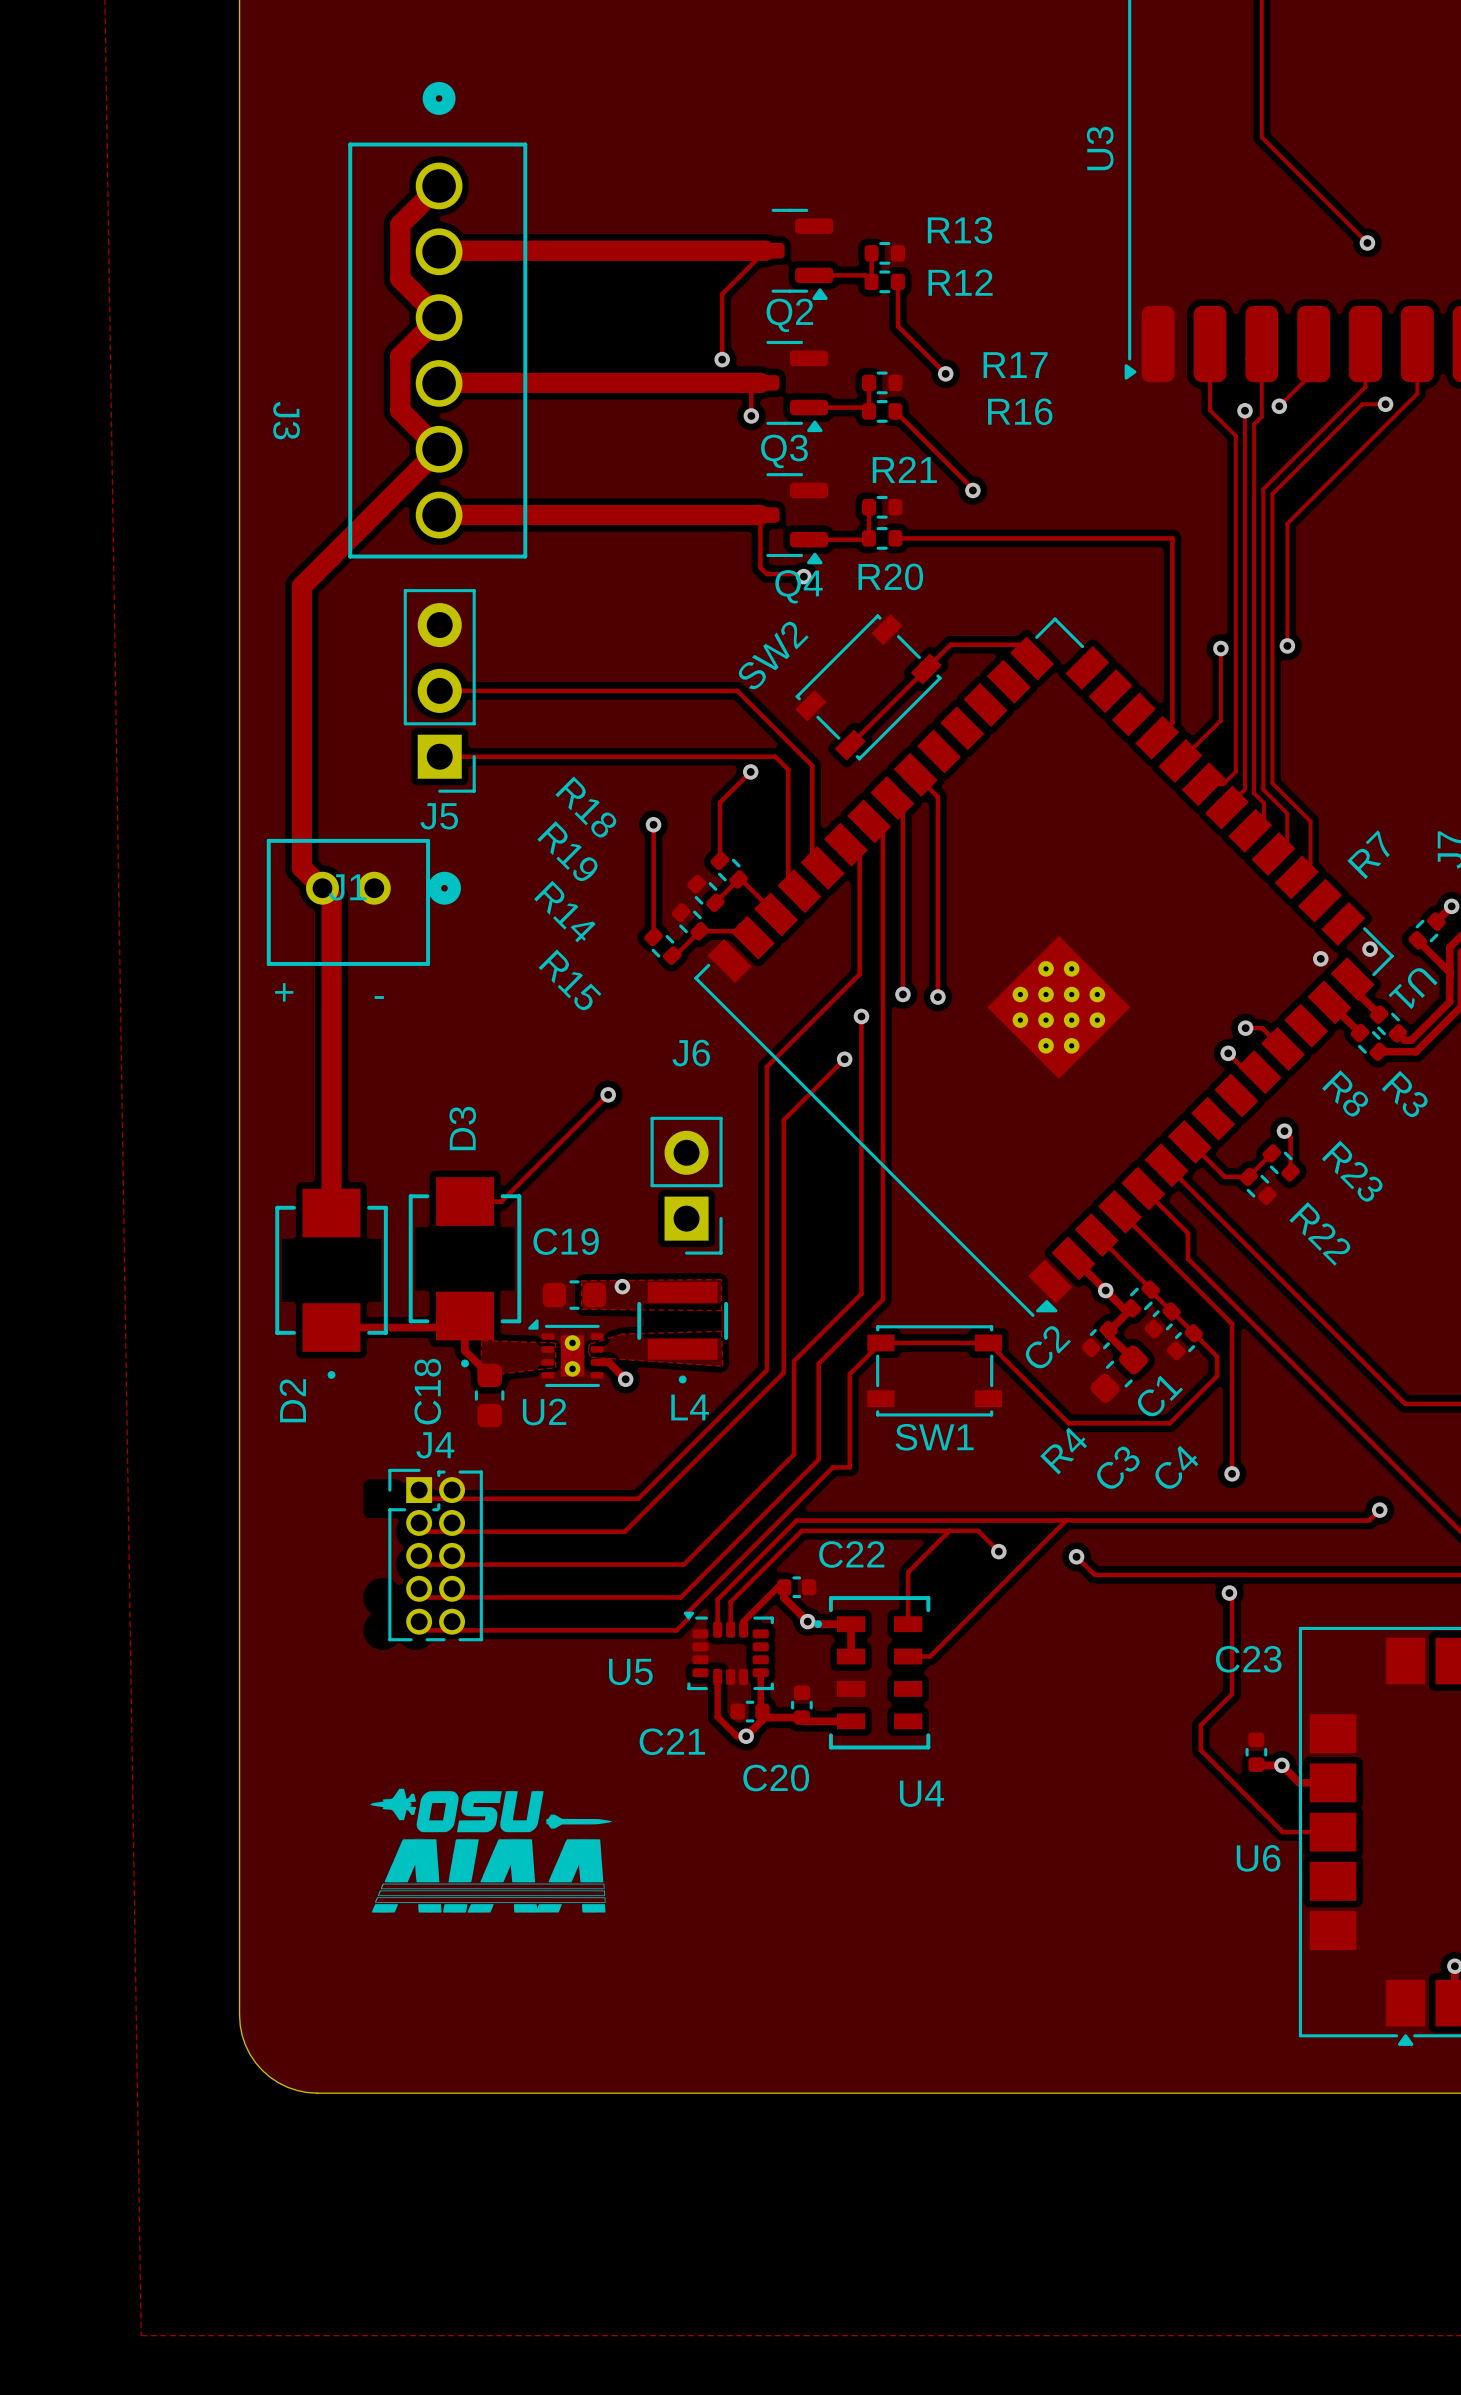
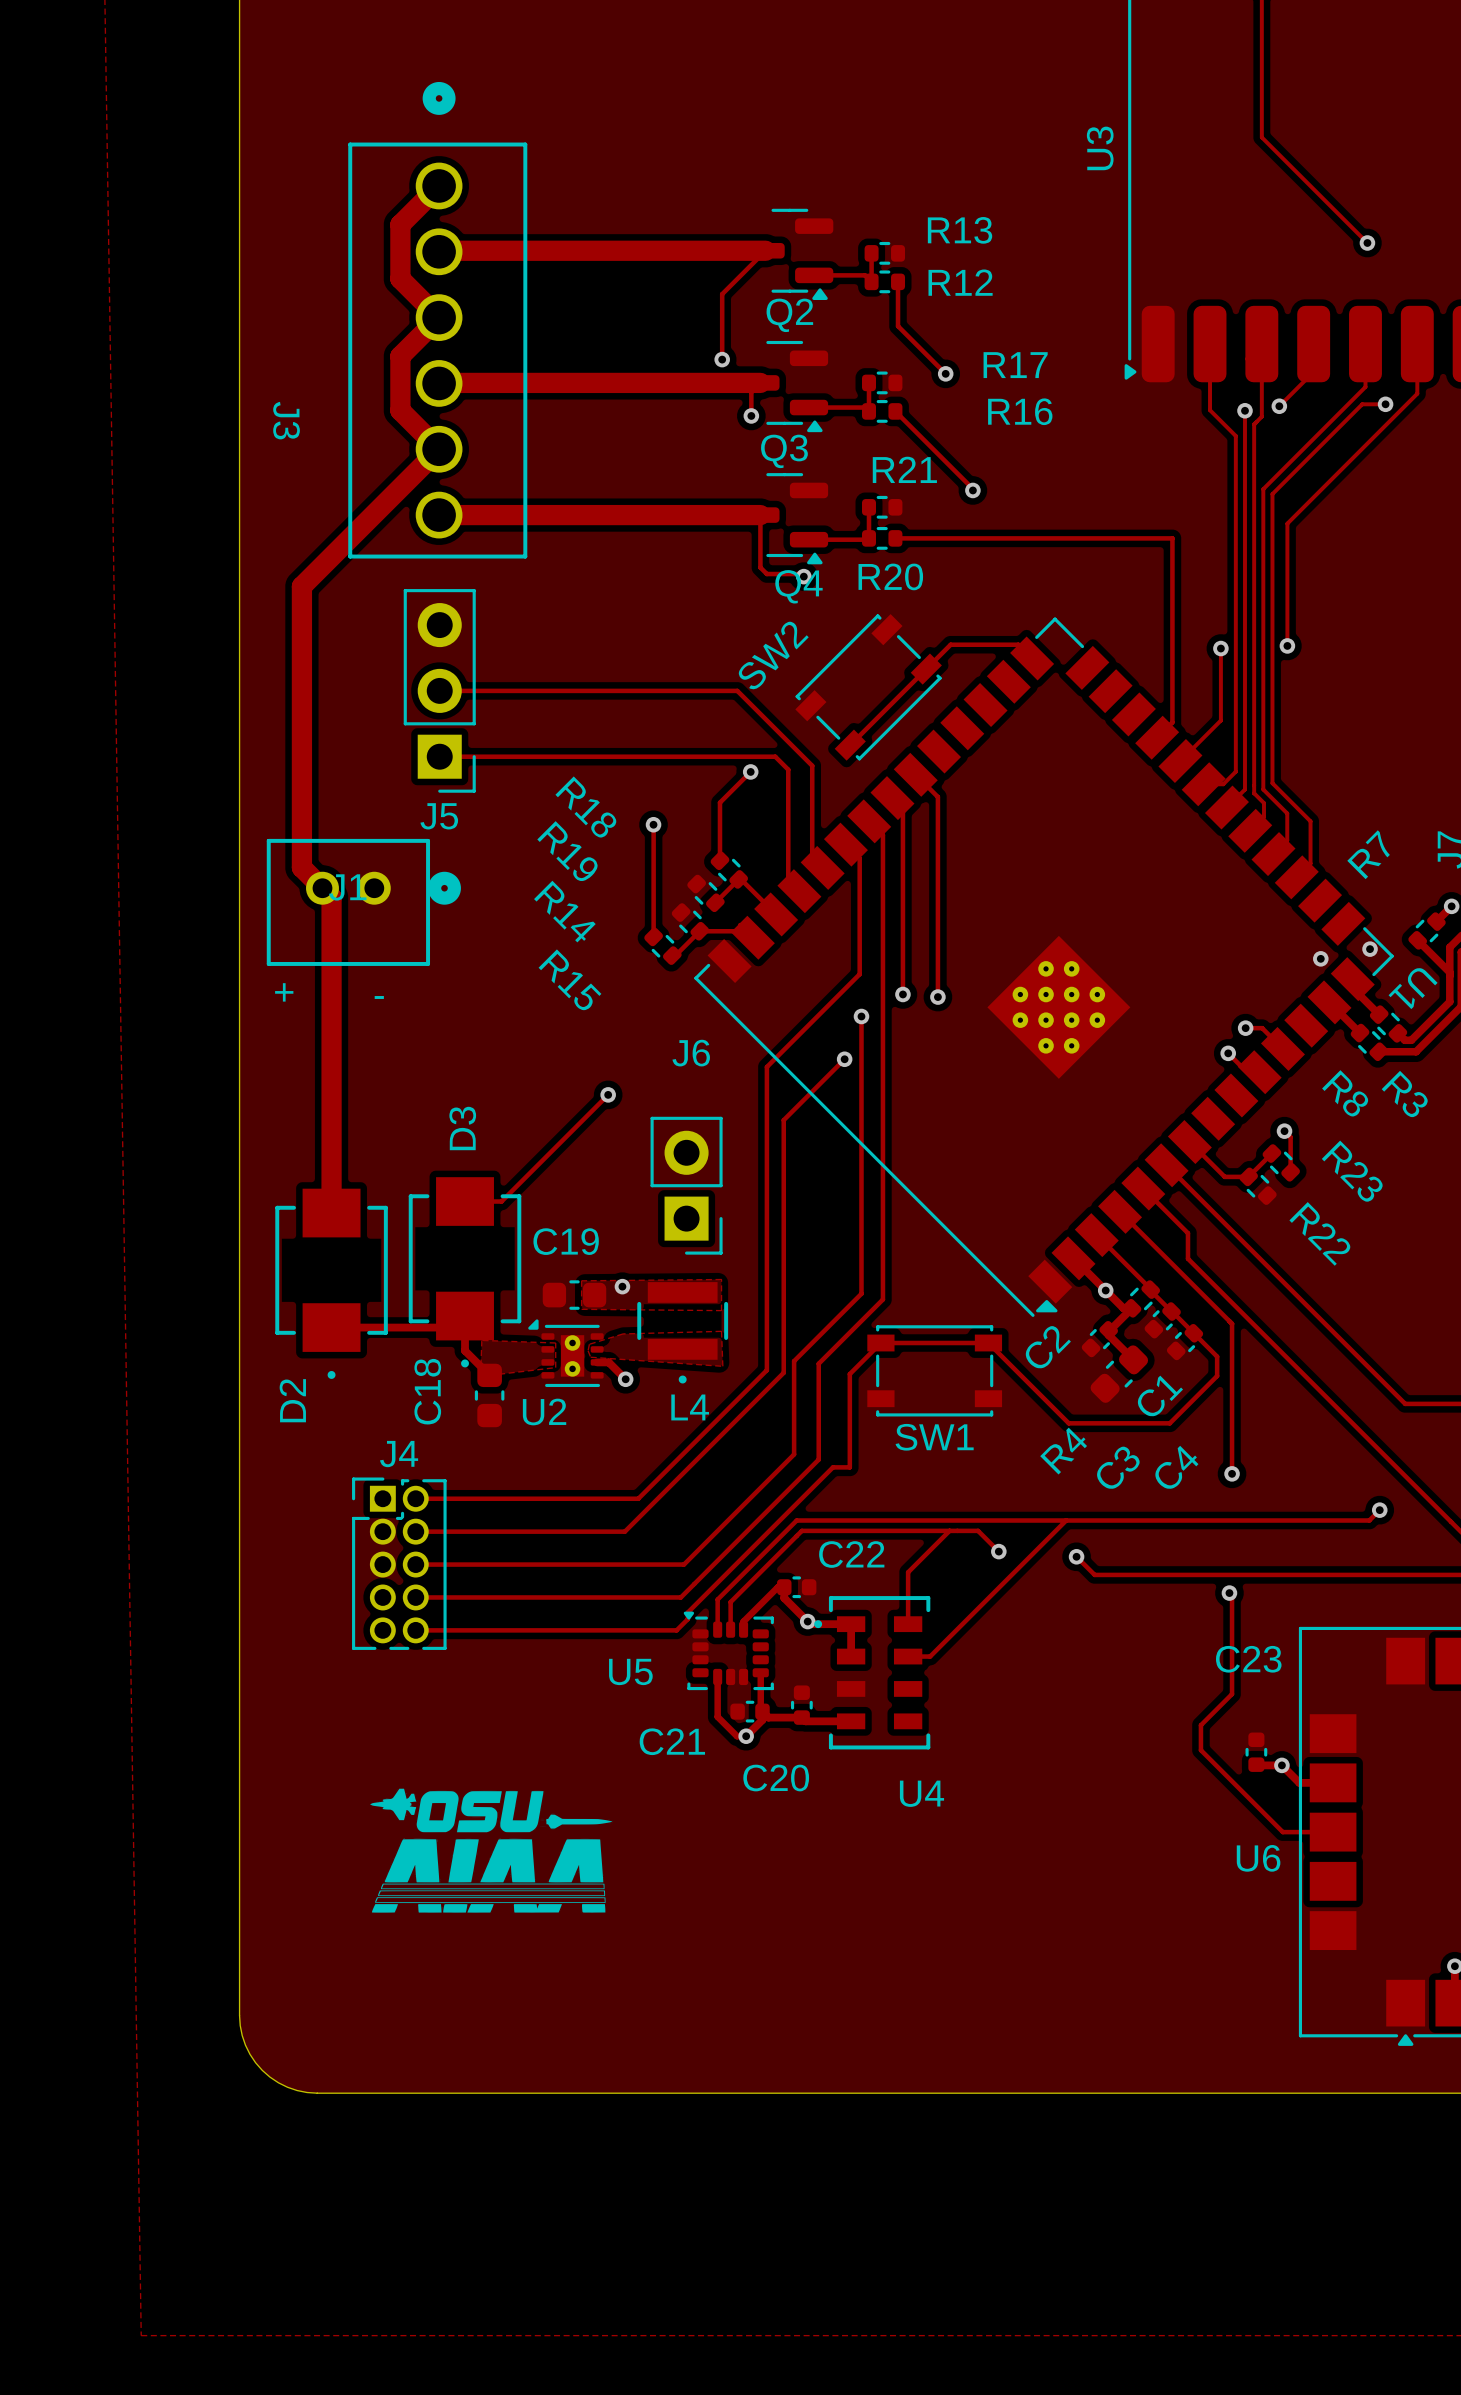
J4 position: (435, 1555) -> (399, 1563)

